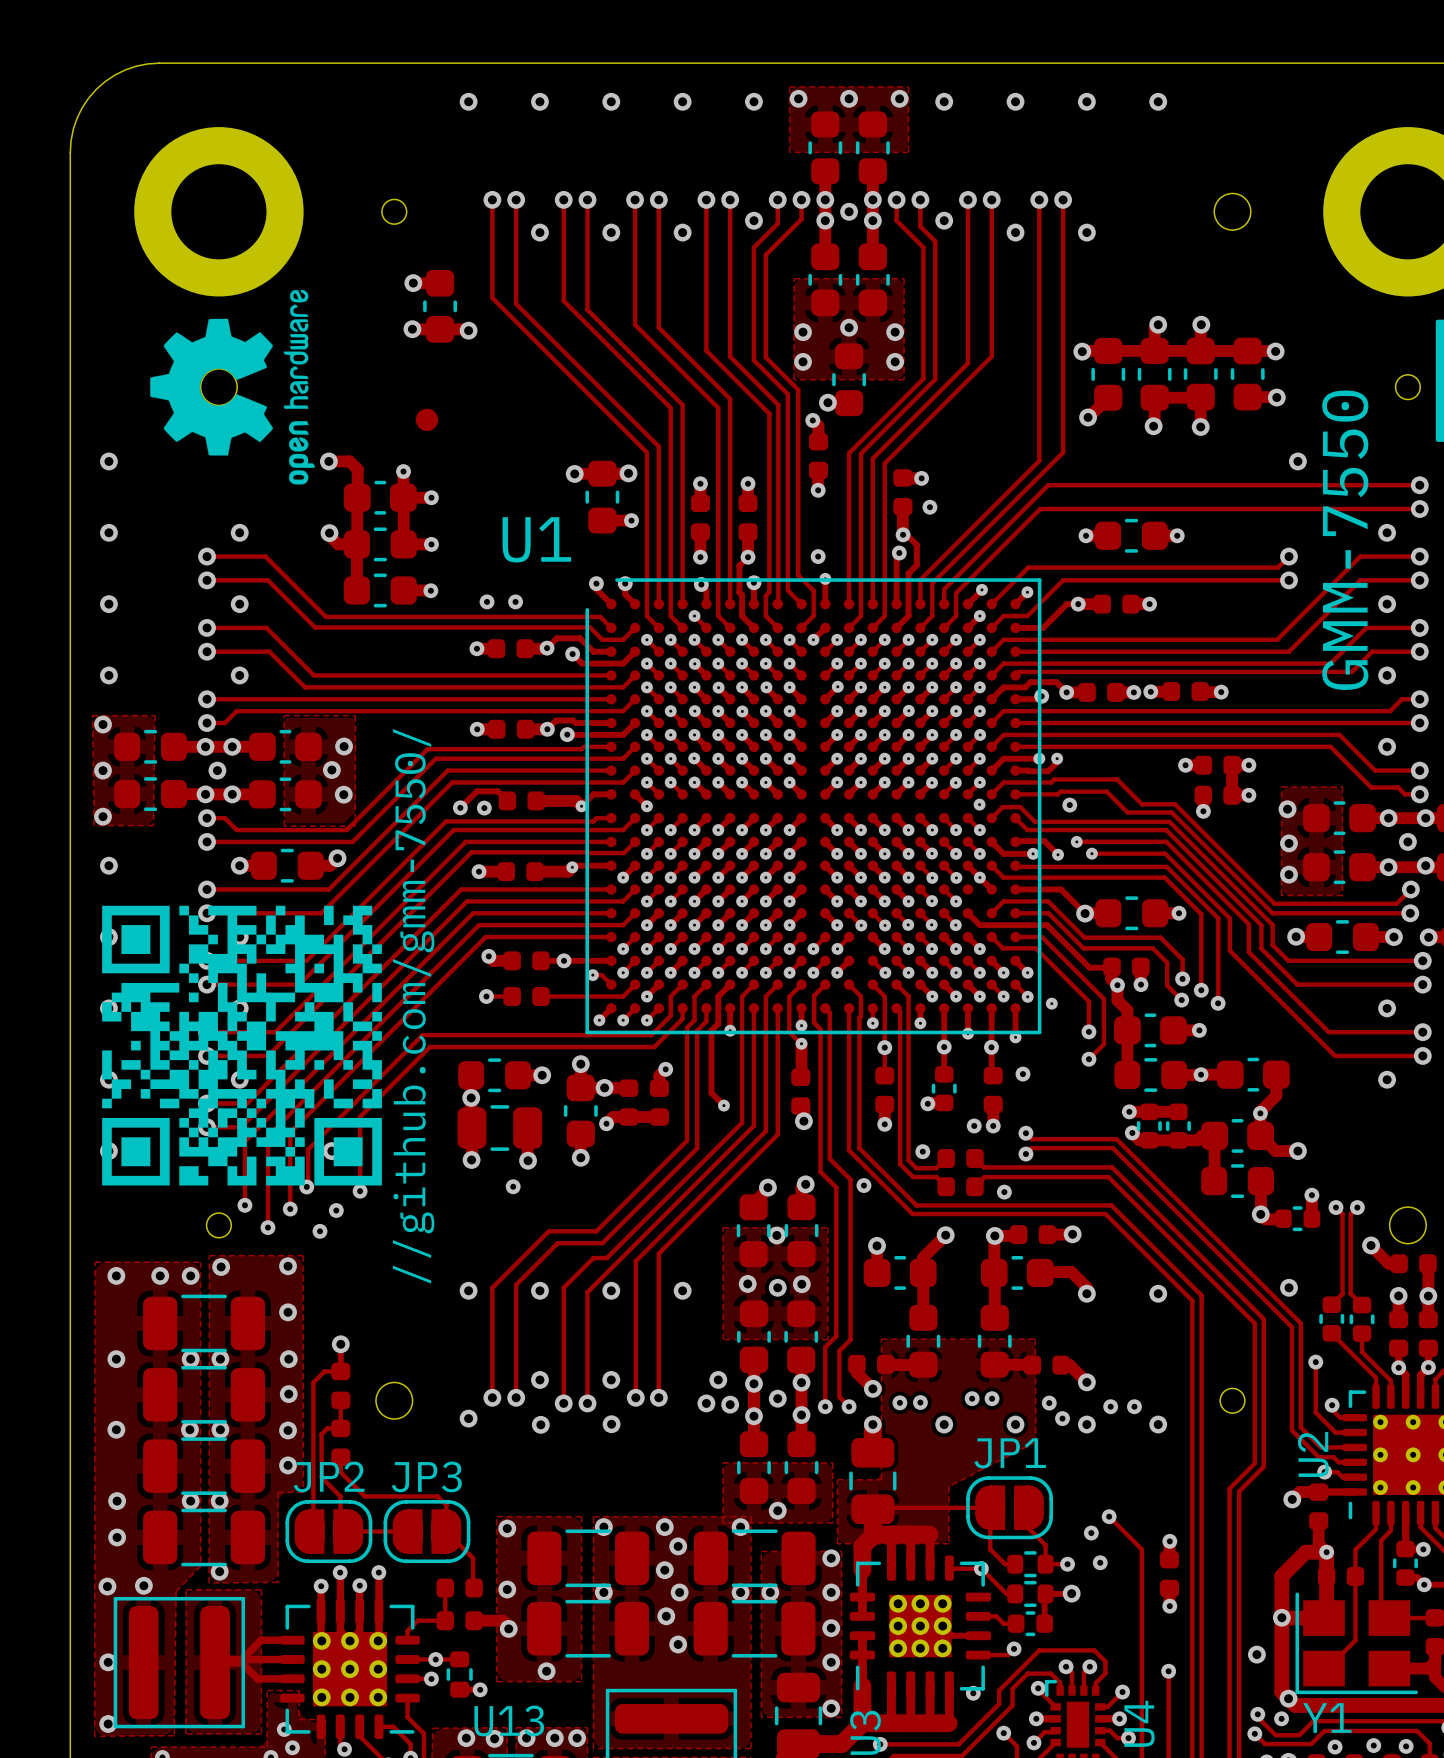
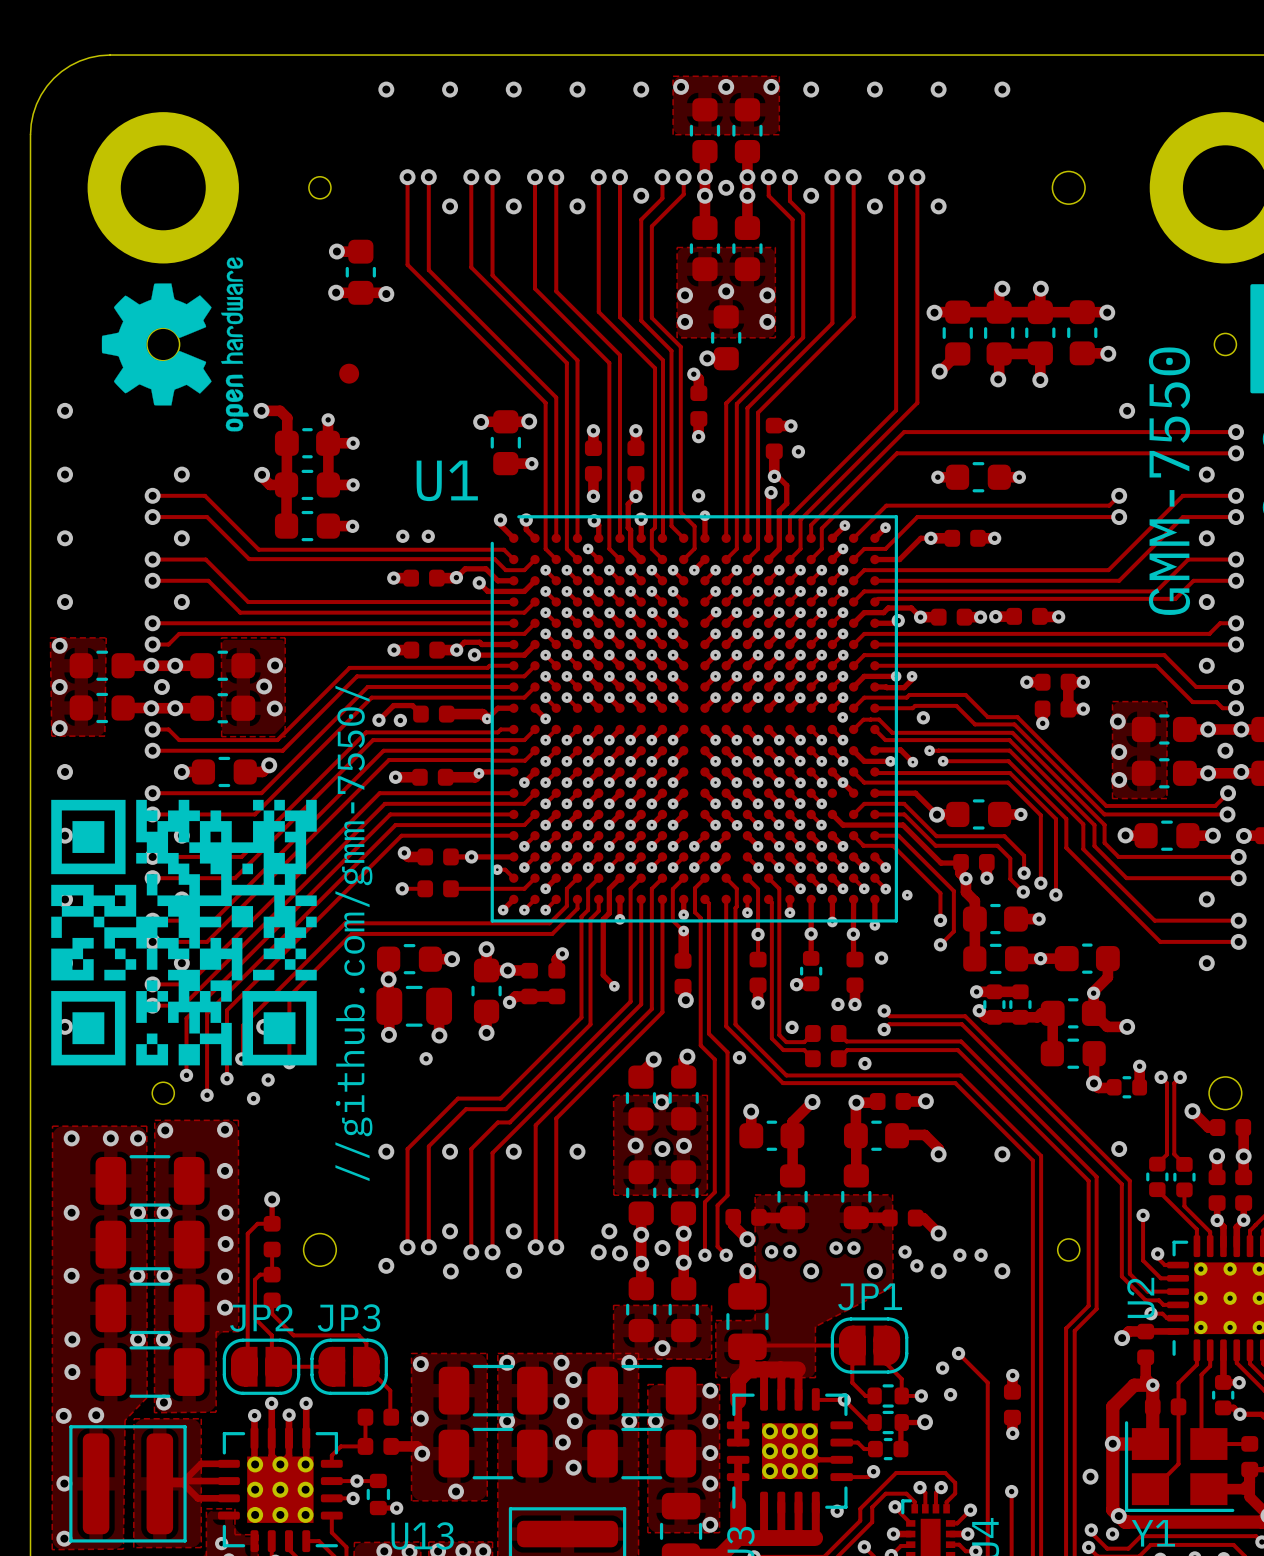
drawing shape: [102, 905, 382, 1186] -> [51, 799, 317, 1066]
text position: //github.com/gmm-7550/ (413, 1006) -> //github.com/gmm-7550/ (353, 933)

